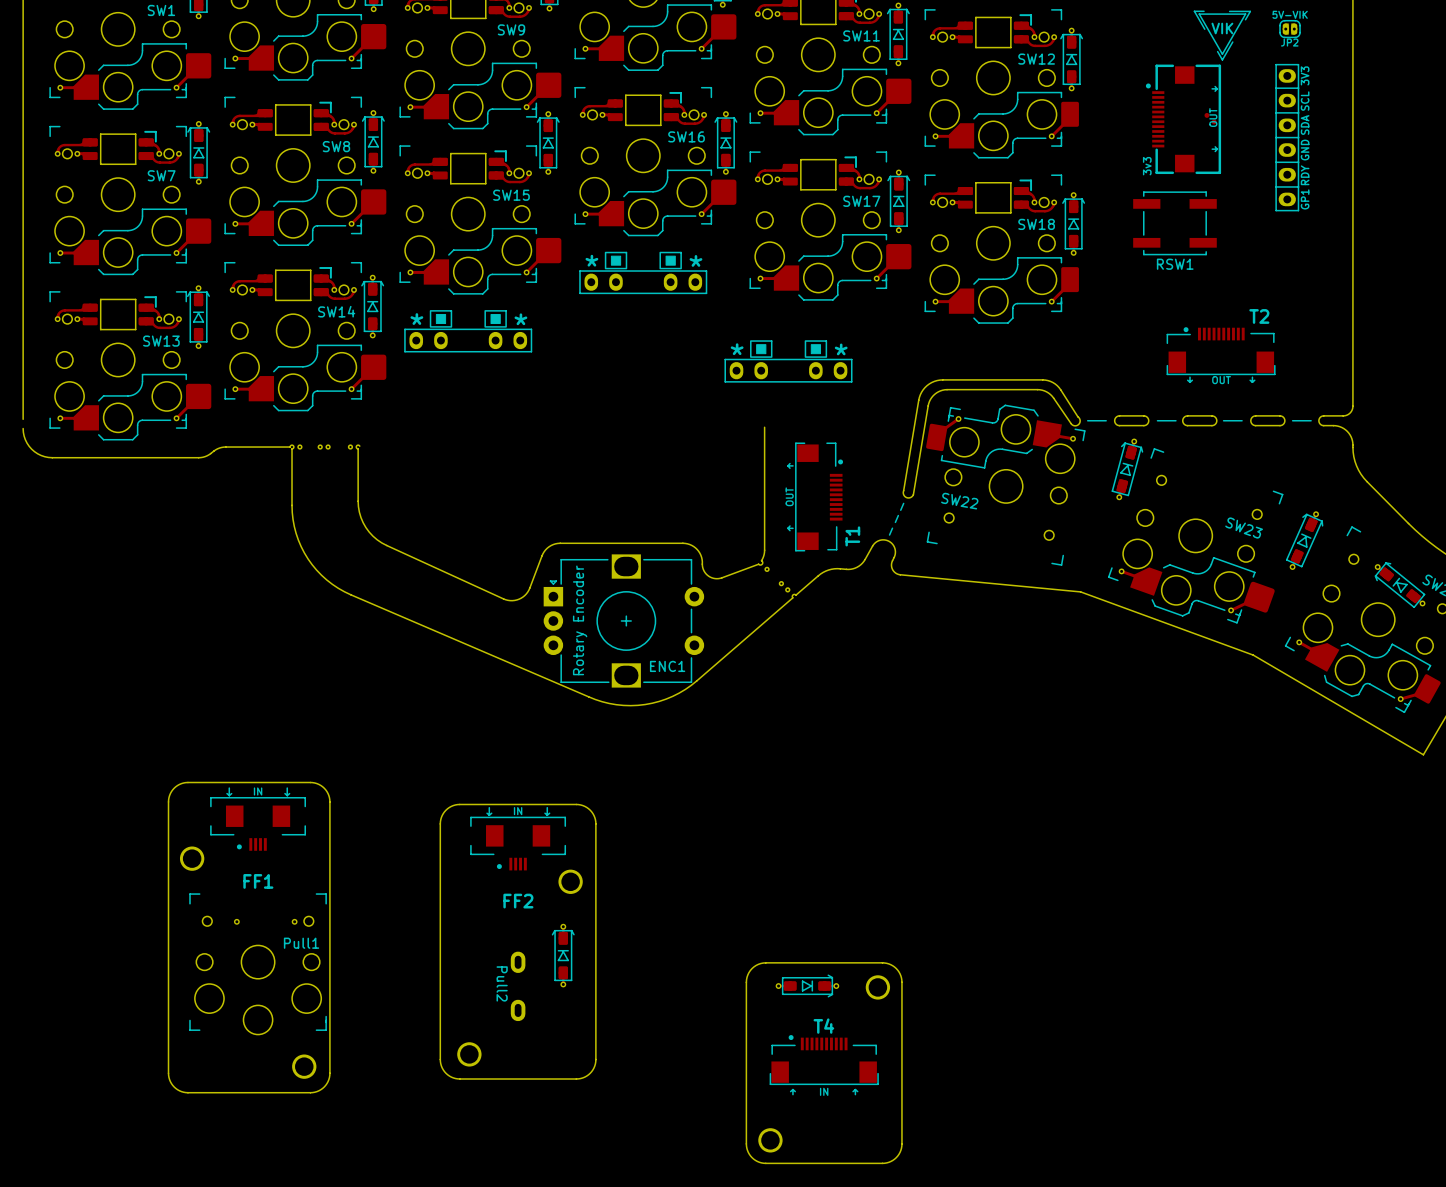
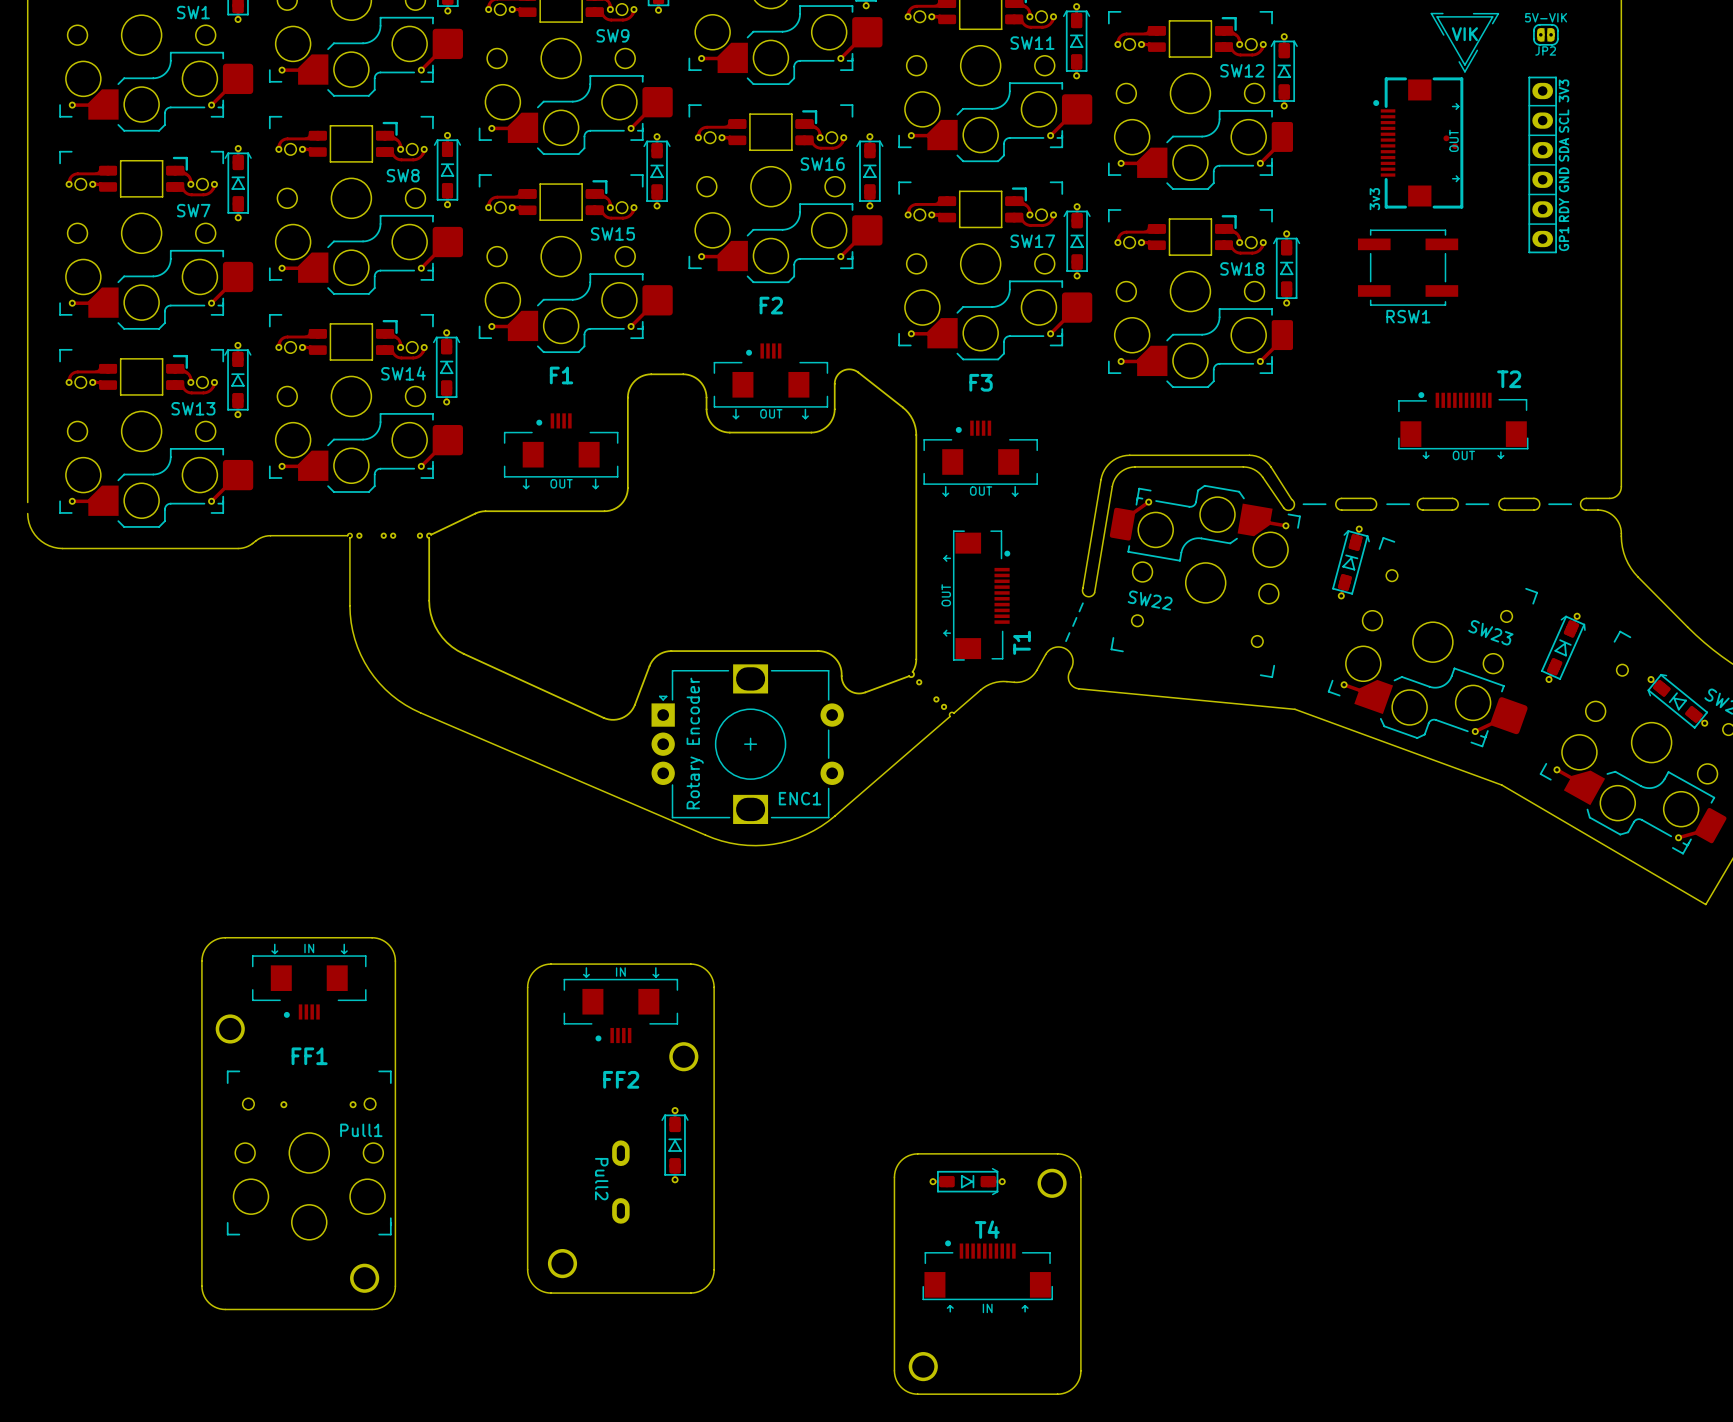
part: (643, 273) -> none
F2: none -> (770, 381)
part: (468, 331) -> none
part: (788, 361) -> none
F1: none -> (561, 451)
F3: none -> (980, 458)
board edge: none -> (916, 512) (916, 434) (912, 419) (902, 407) (855, 370) (846, 369) (837, 375) (834, 382) (834, 411) (832, 419) (823, 428) (811, 432) (722, 431) (713, 425) (708, 419) (705, 392) (697, 379) (685, 374) (651, 374) (636, 379) (628, 392) (627, 490) (624, 500) (619, 506) (604, 511) (482, 511) (431, 534)

